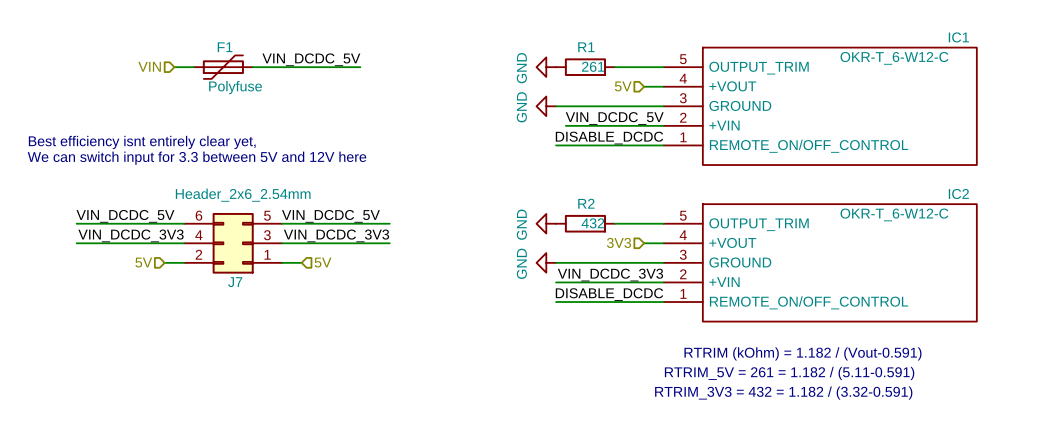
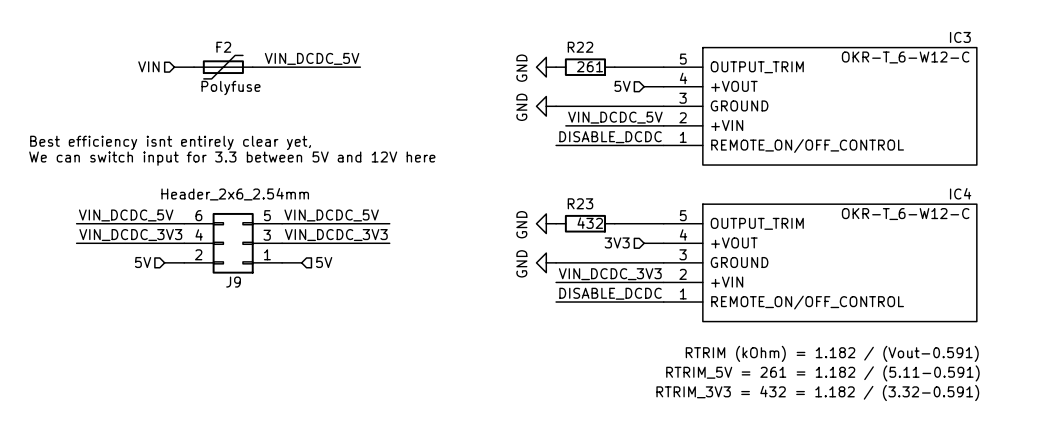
IC1 name: IC1 (958, 37) -> IC3 (960, 37)
F1 name: F1 (225, 47) -> F2 (223, 47)
R1 name: R1 (586, 47) -> R22 (580, 47)
IC2 name: IC2 (958, 194) -> IC4 (960, 193)
R2 name: R2 (586, 203) -> R23 (580, 203)
J7 name: J7 (235, 282) -> J9 (233, 282)

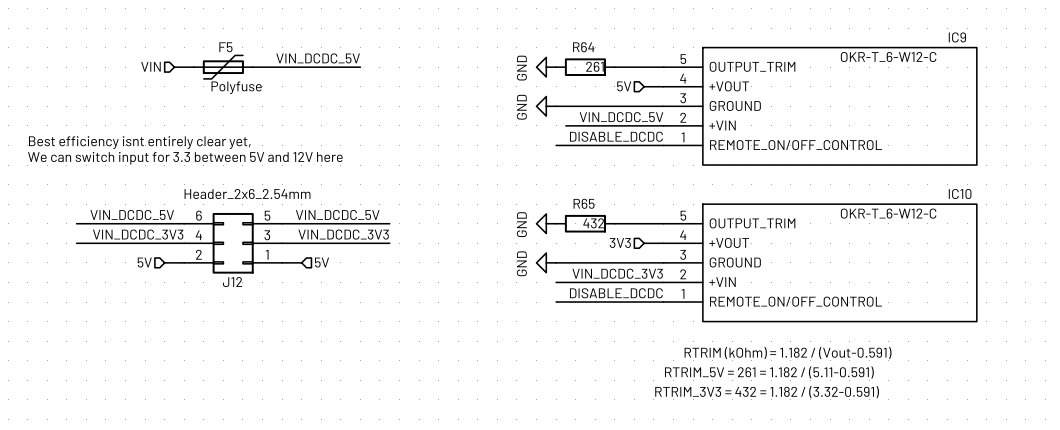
IC3 name: IC3 (960, 37) -> IC9 (957, 37)
F2 name: F2 (223, 47) -> F5 (225, 47)
R22 name: R22 (580, 47) -> R64 (583, 47)
IC4 name: IC4 (960, 193) -> IC10 (960, 194)
R23 name: R23 (580, 203) -> R65 (584, 203)
J9 name: J9 (233, 282) -> J12 (232, 282)

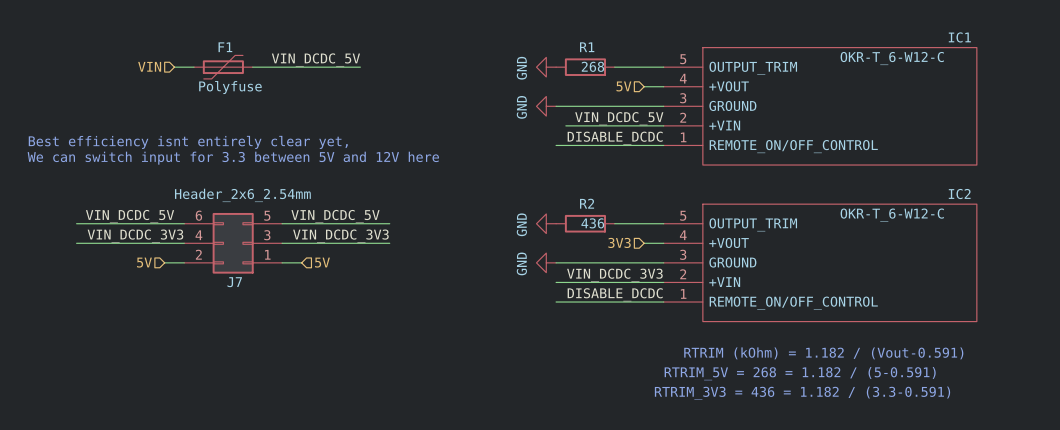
IC9 name: IC9 (957, 37) -> IC1 (959, 37)
F5 name: F5 (225, 47) -> F1 (225, 47)
R64 name: R64 (583, 47) -> R1 (587, 47)
R64 value: 261 (594, 66) -> 268 (592, 66)
IC10 name: IC10 (960, 194) -> IC2 (959, 194)
R65 name: R65 (584, 203) -> R2 (587, 203)
R65 value: 432 (593, 223) -> 436 (592, 223)
J12 name: J12 (232, 282) -> J7 (234, 282)
text: RTRIM_5V = 261 = 1.182 / (5.11-0.591) (769, 372) -> RTRIM_5V = 268 = 1.182 / (5-0.591) (800, 373)
text: RTRIM_3V3 = 432 = 1.182 / (3.32-0.591) (767, 392) -> RTRIM_3V3 = 436 = 1.182 / (3.3-0.591) (802, 393)

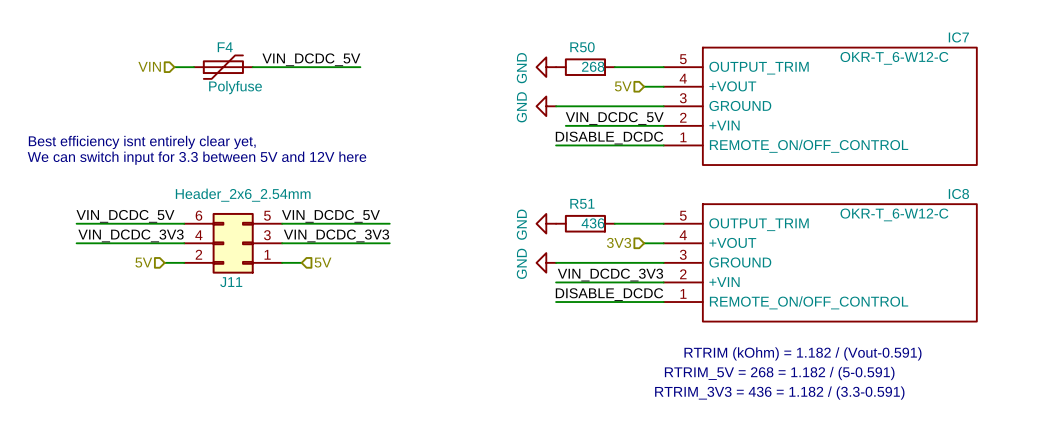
IC1 name: IC1 (959, 37) -> IC7 (958, 37)
F1 name: F1 (225, 47) -> F4 (225, 47)
R1 name: R1 (587, 47) -> R50 (582, 47)
IC2 name: IC2 (959, 194) -> IC8 (958, 194)
R2 name: R2 (587, 203) -> R51 (582, 203)
J7 name: J7 (234, 282) -> J11 (231, 282)

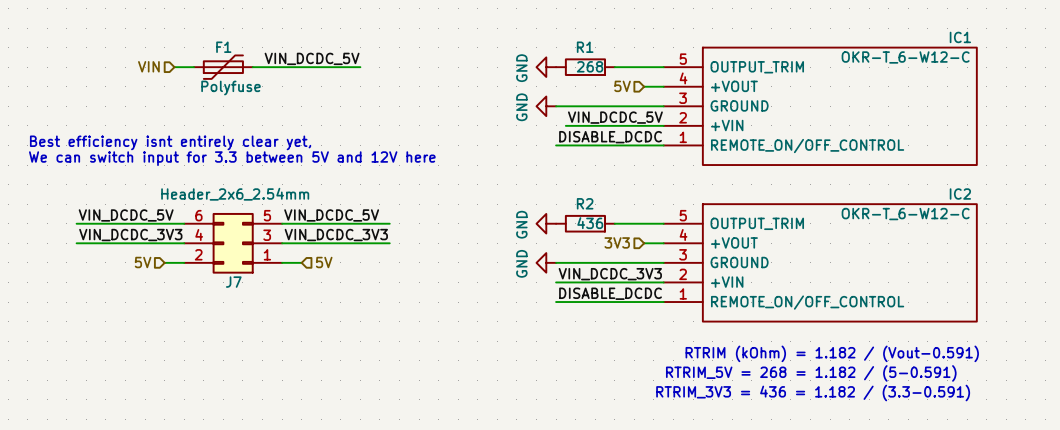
IC7 name: IC7 (958, 37) -> IC1 (960, 37)
F4 name: F4 (225, 47) -> F1 (223, 47)
R50 name: R50 (582, 47) -> R1 (585, 47)
IC8 name: IC8 (958, 194) -> IC2 (960, 194)
R51 name: R51 (582, 203) -> R2 (585, 203)
J11 name: J11 (231, 282) -> J7 (233, 282)

